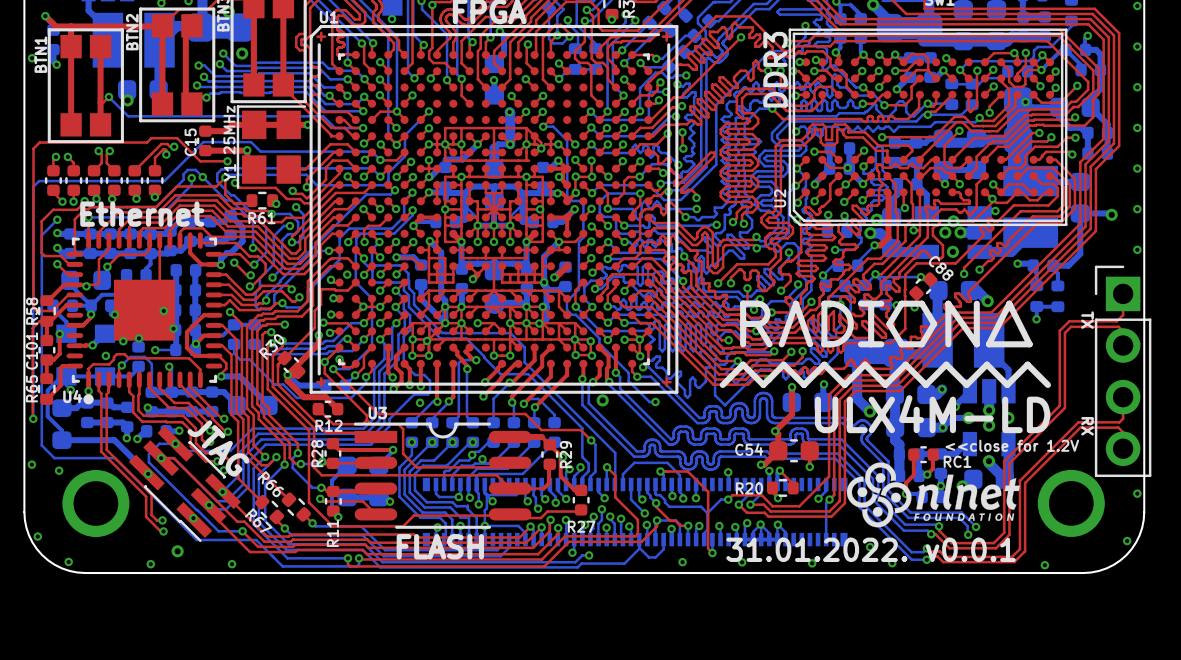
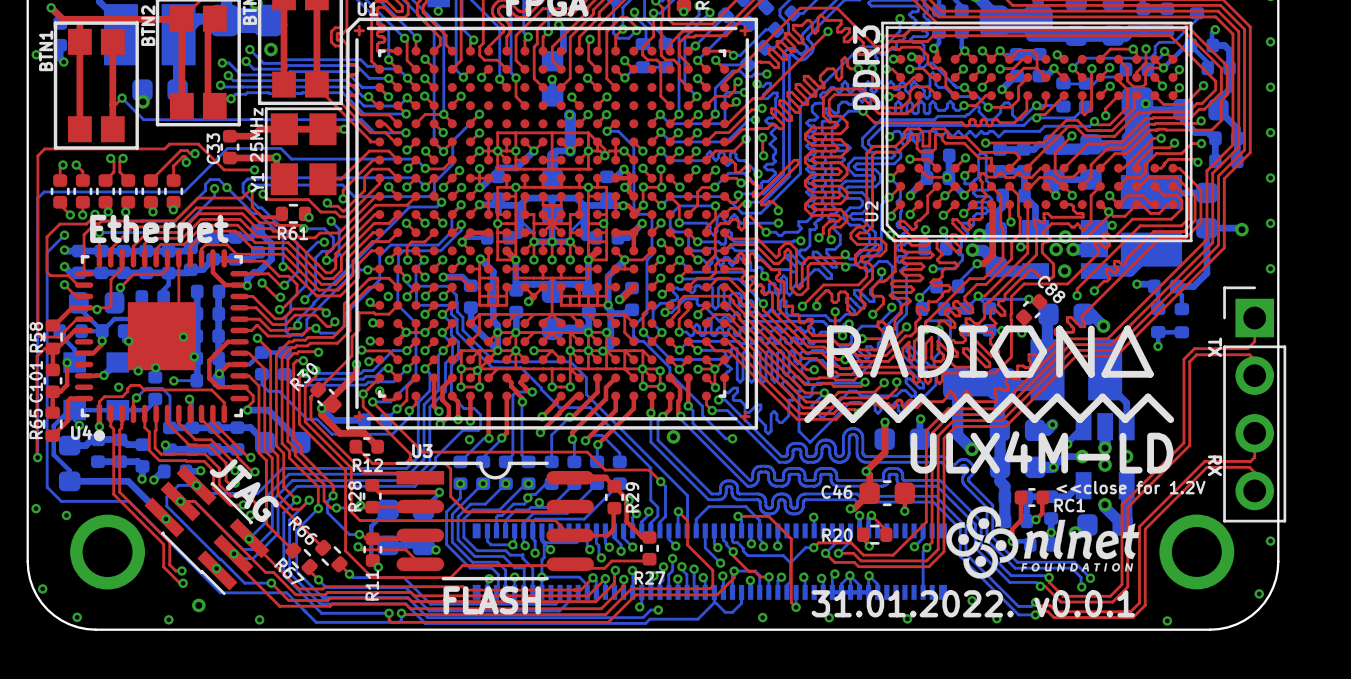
C15 name: C15 (190, 142) -> C33 (213, 148)
C54 name: C54 (749, 449) -> C46 (836, 491)

